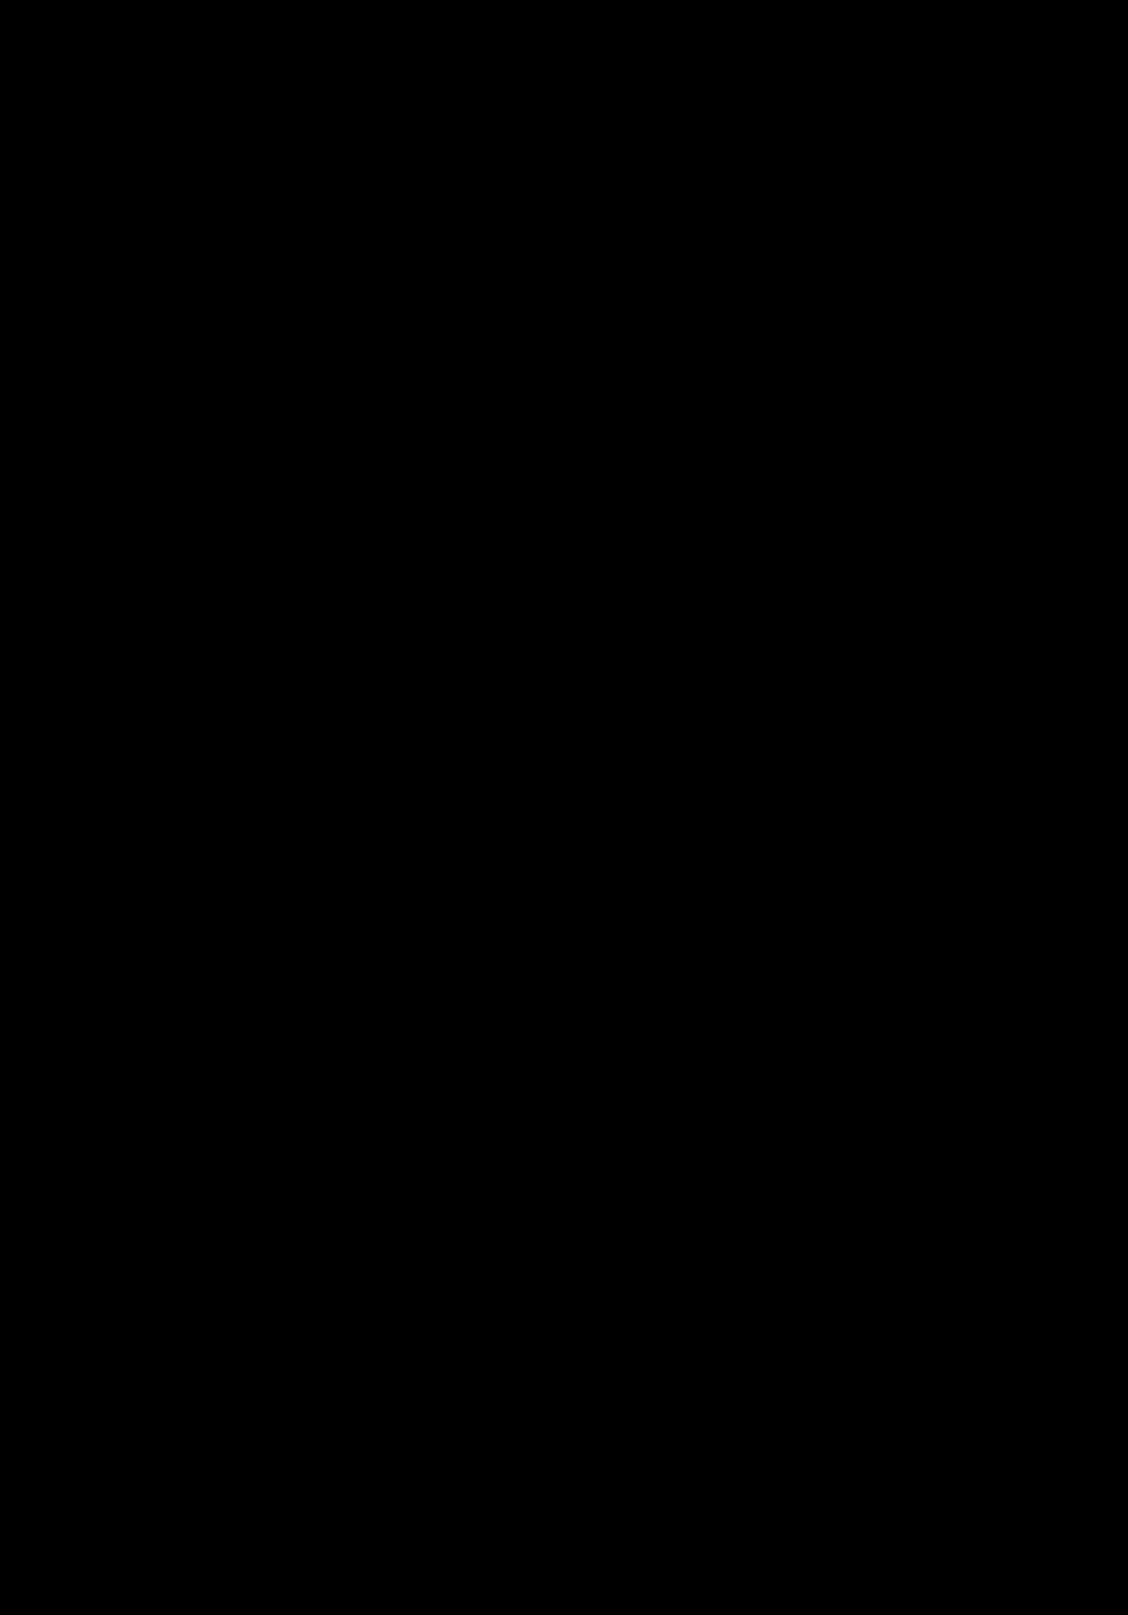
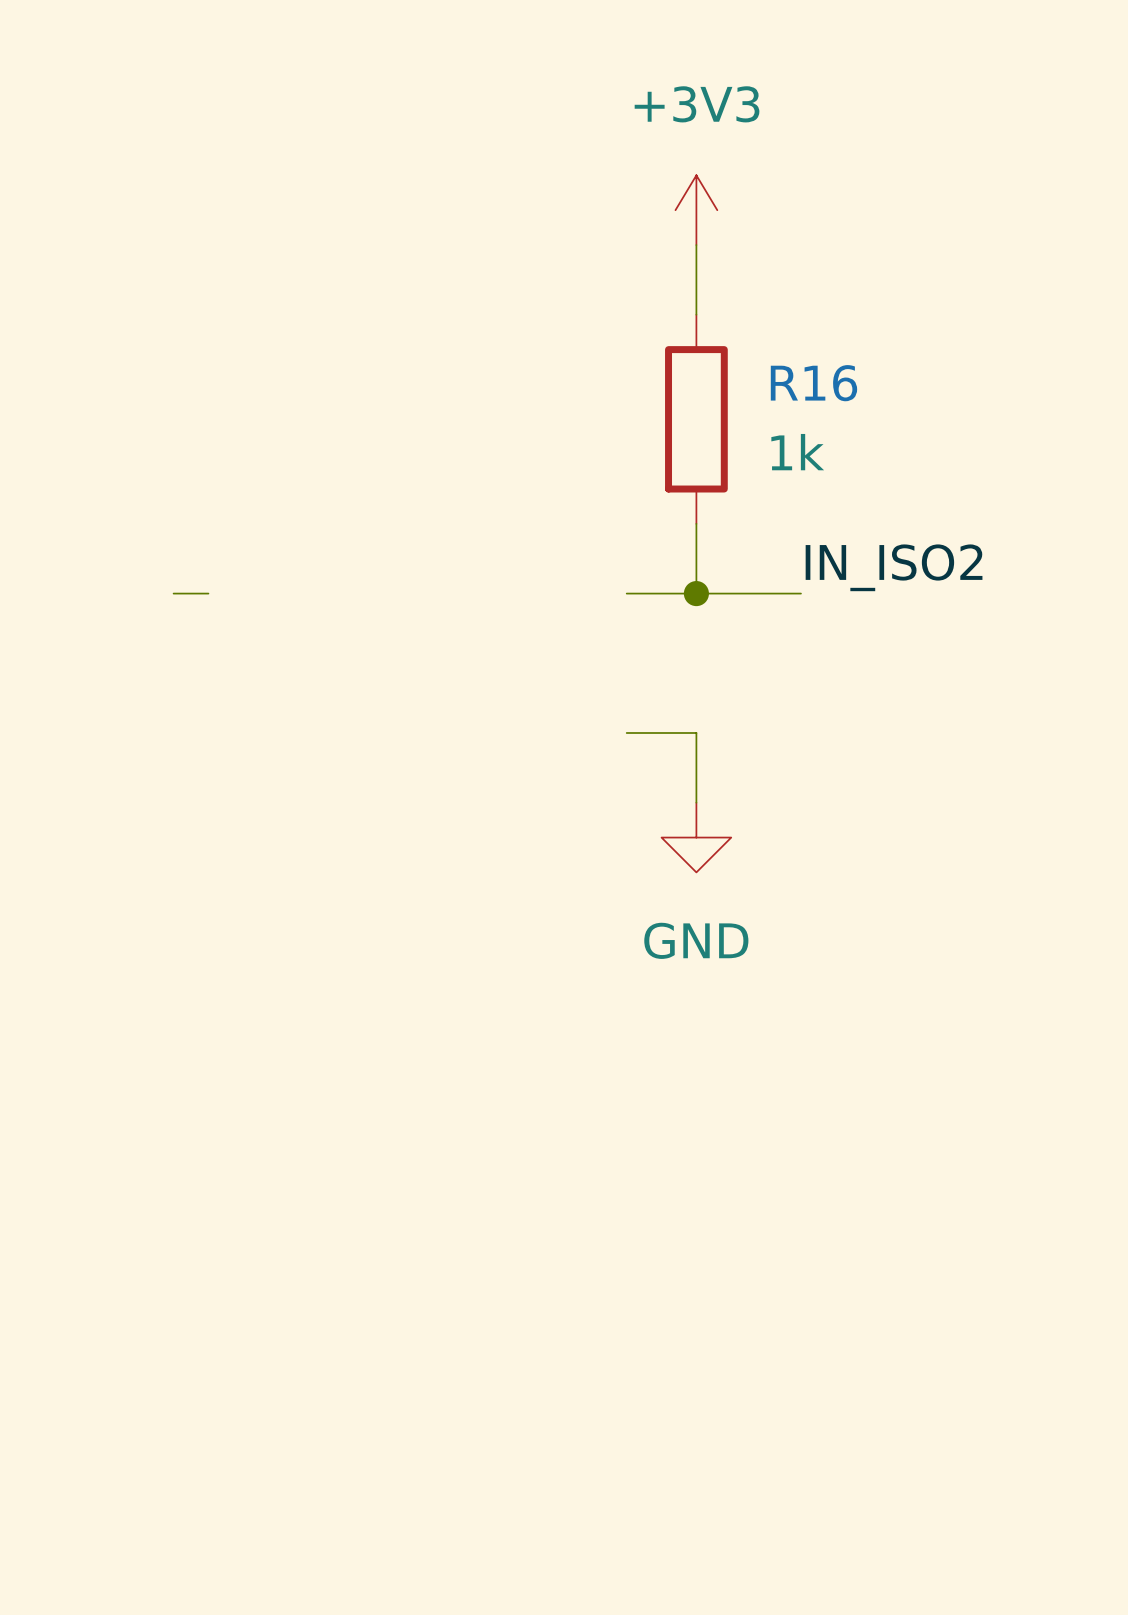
power symbol: none -> +3V3 (696, 210)
wire: none -> (696, 245) (696, 314)
R16: none -> 1k (696, 419)
wire: none -> (696, 523) (696, 593)
label: none -> IN_ISO2 (894, 567)
wire: none -> (173, 593) (208, 593)
wire: none -> (626, 593) (800, 593)
junction: none -> (696, 593)
wire: none -> (626, 732) (696, 732) (696, 802)
power symbol: none -> GND (696, 837)

